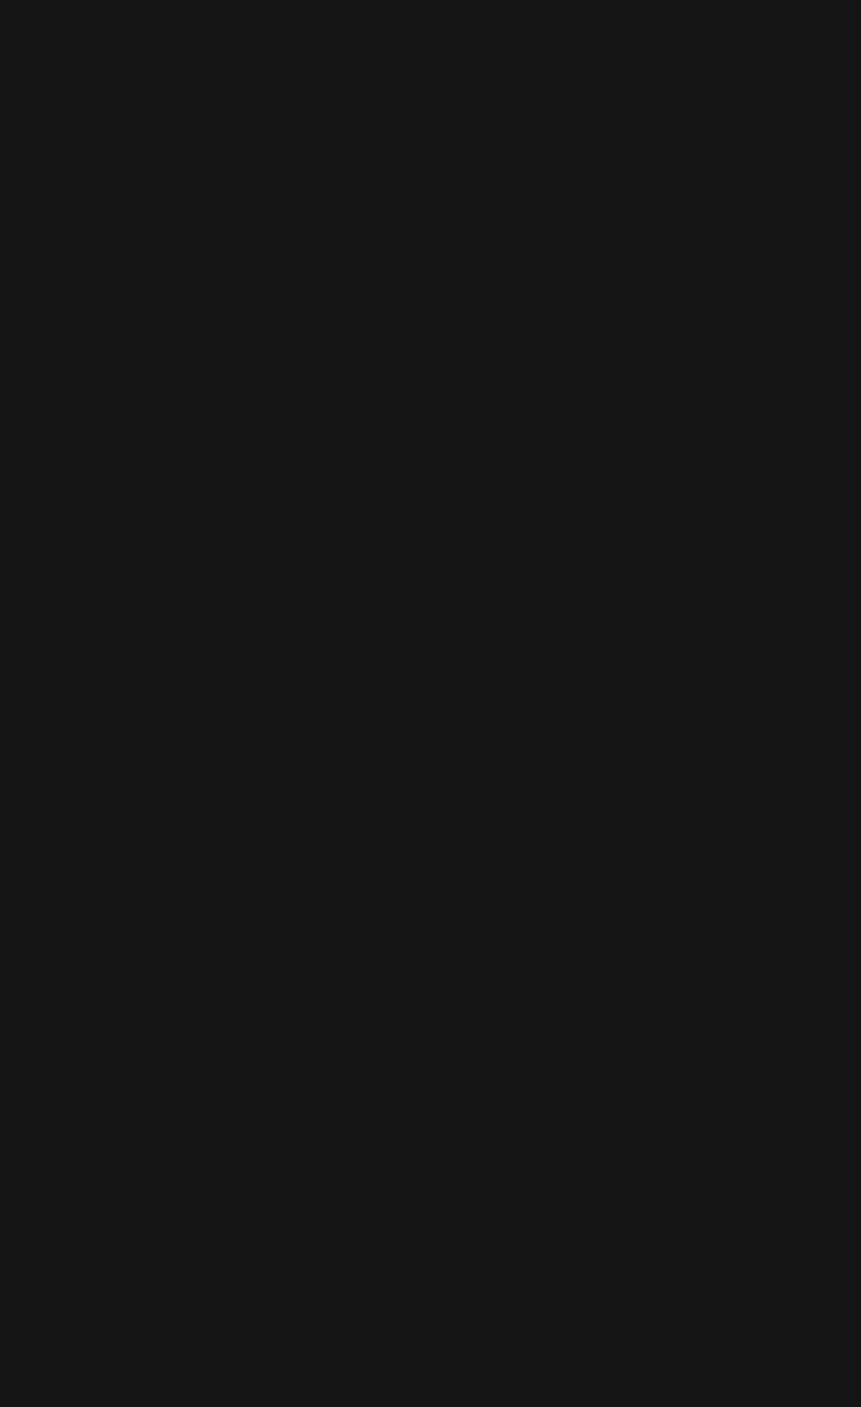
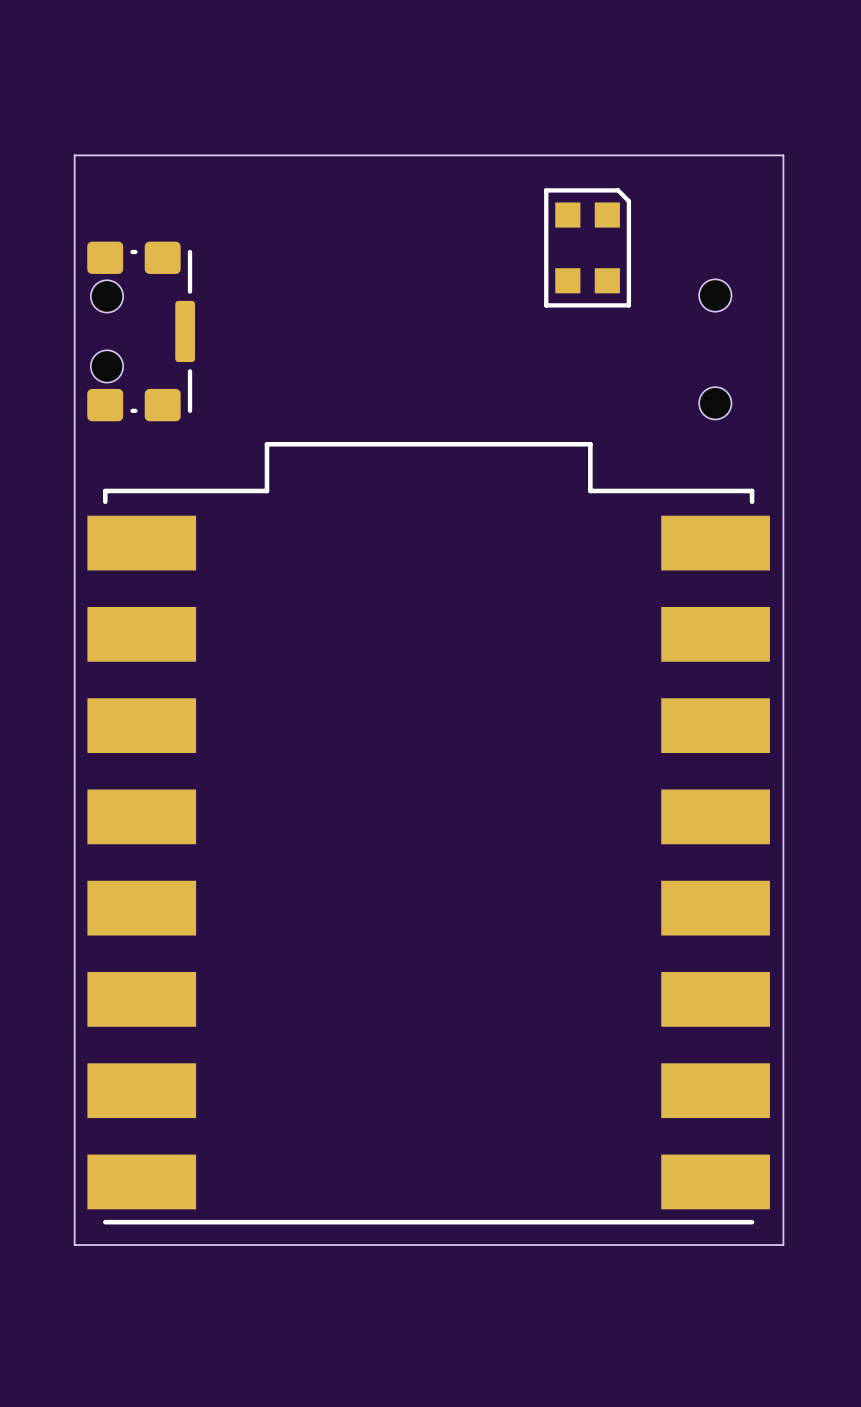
board edge: none -> (783, 155) (783, 1245) (74, 1245) (74, 155) (783, 155)
part: none -> (587, 247)
part: none -> (141, 331)
part: none -> (715, 349)
part: none -> (428, 833)

